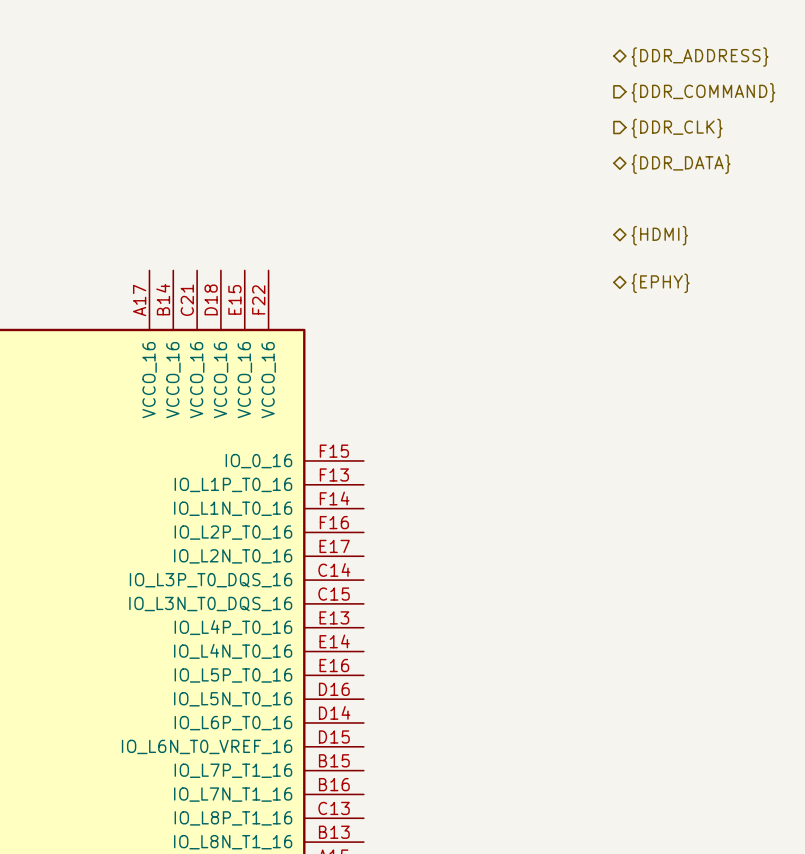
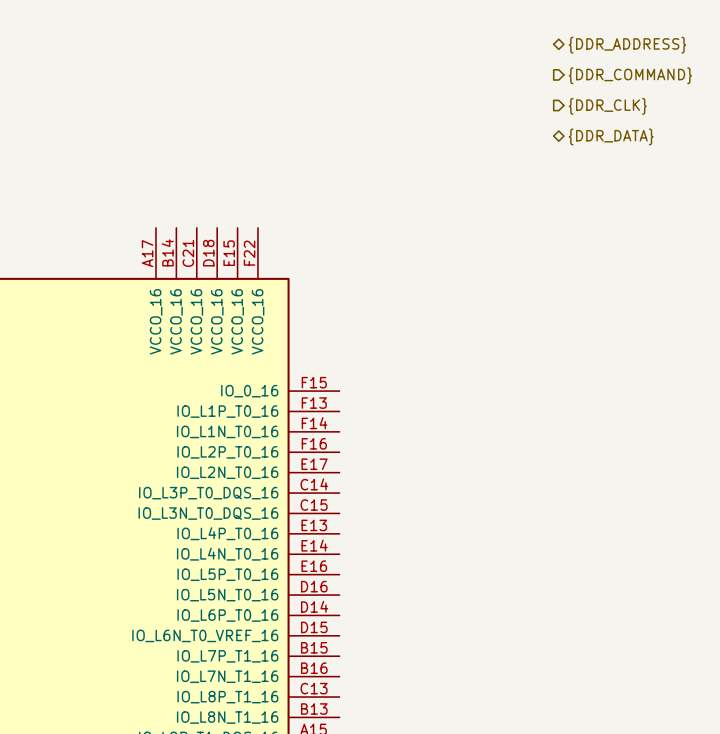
hierarchical label: {HDMI} (659, 235) -> none
hierarchical label: {EPHY} (660, 283) -> none

